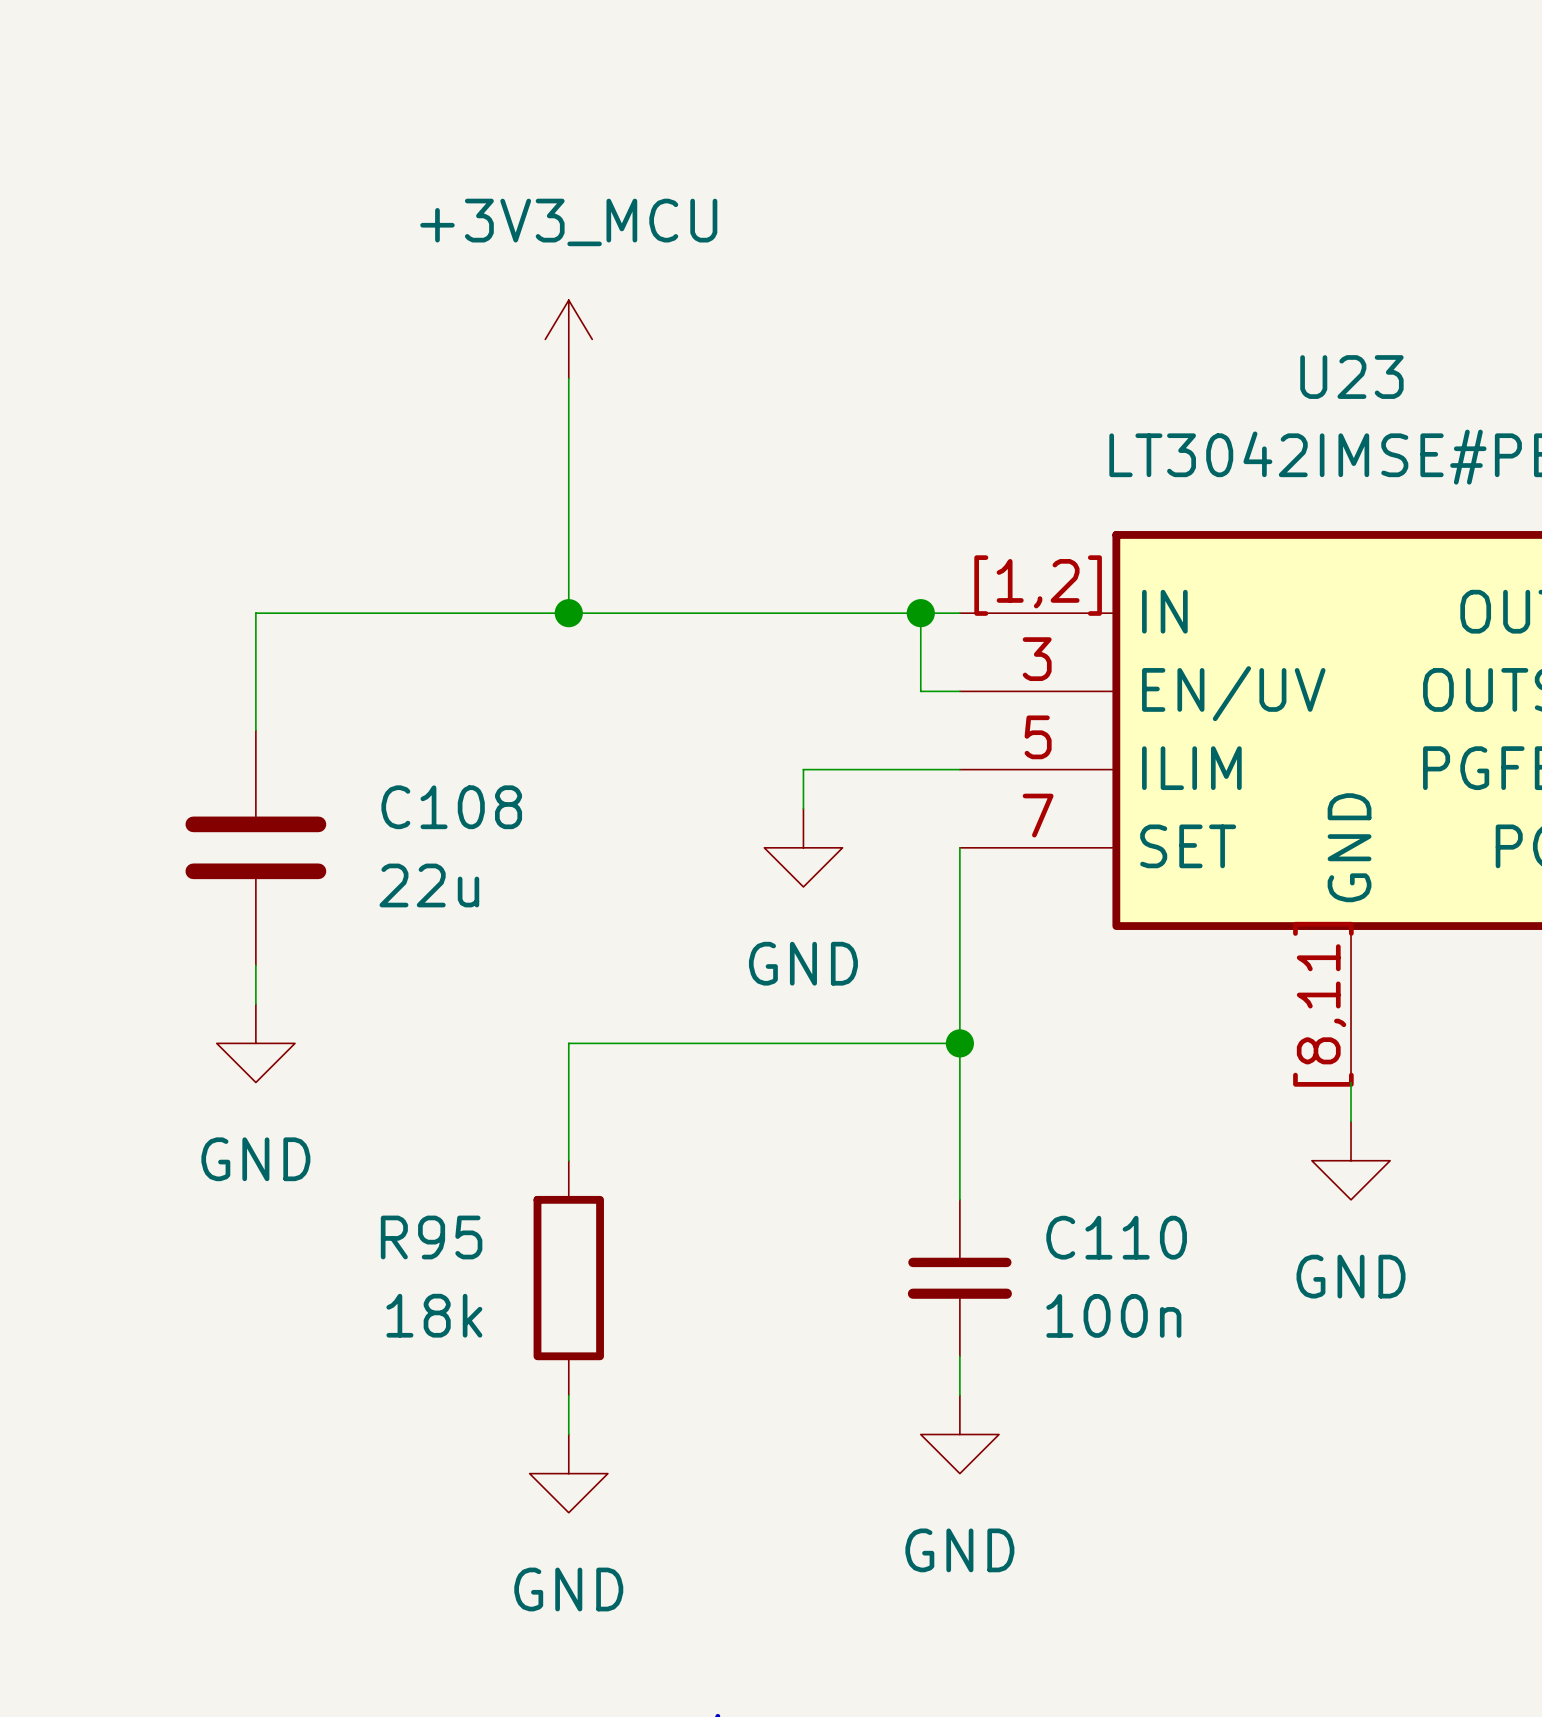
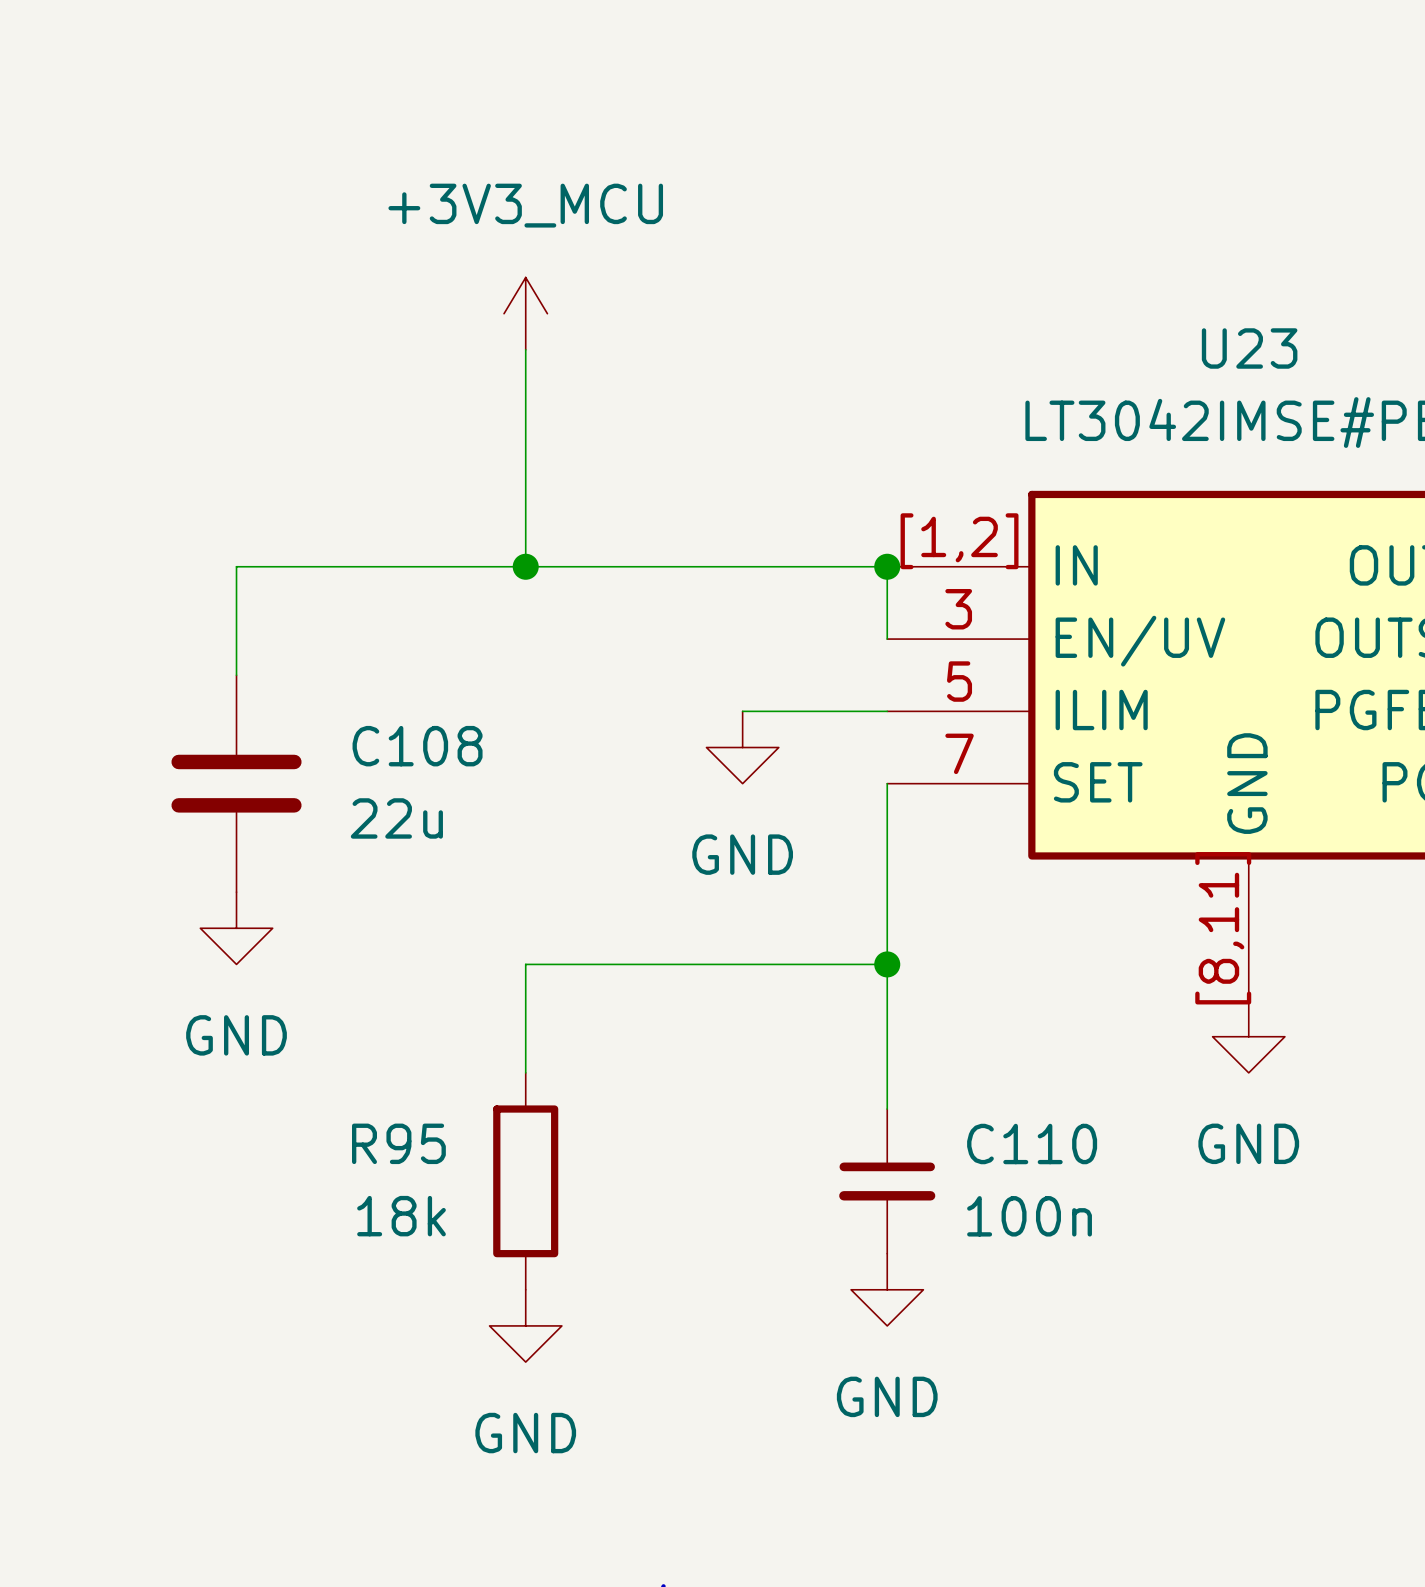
wire: (920, 613) (920, 691) (959, 691) -> (887, 566) (887, 639)
junction position: (920, 613) -> (887, 566)
power symbol position: GND (803, 847) -> GND (742, 747)
power symbol position: GND (255, 1043) -> GND (236, 928)
power symbol position: GND (1351, 1160) -> GND (1248, 1036)
power symbol position: GND (959, 1434) -> GND (887, 1289)
power symbol position: GND (568, 1473) -> GND (525, 1325)

